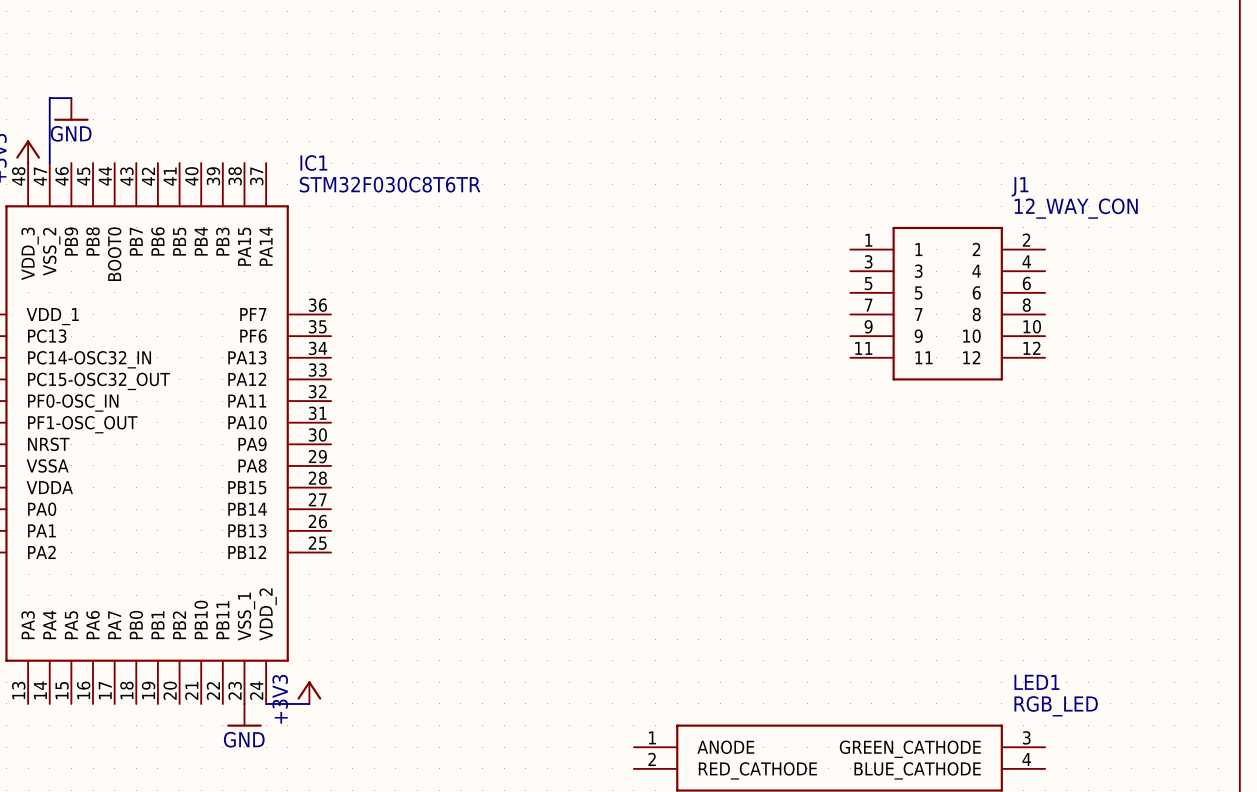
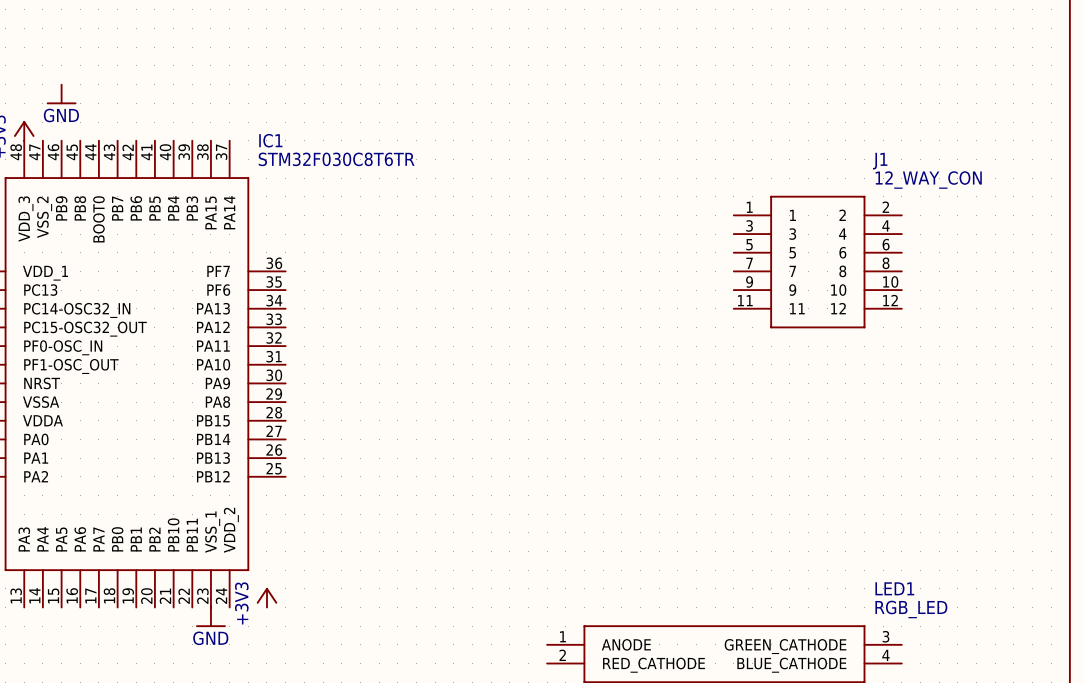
wire: (71, 98) (49, 98) (49, 163) -> none
wire: (266, 703) (309, 703) -> none

